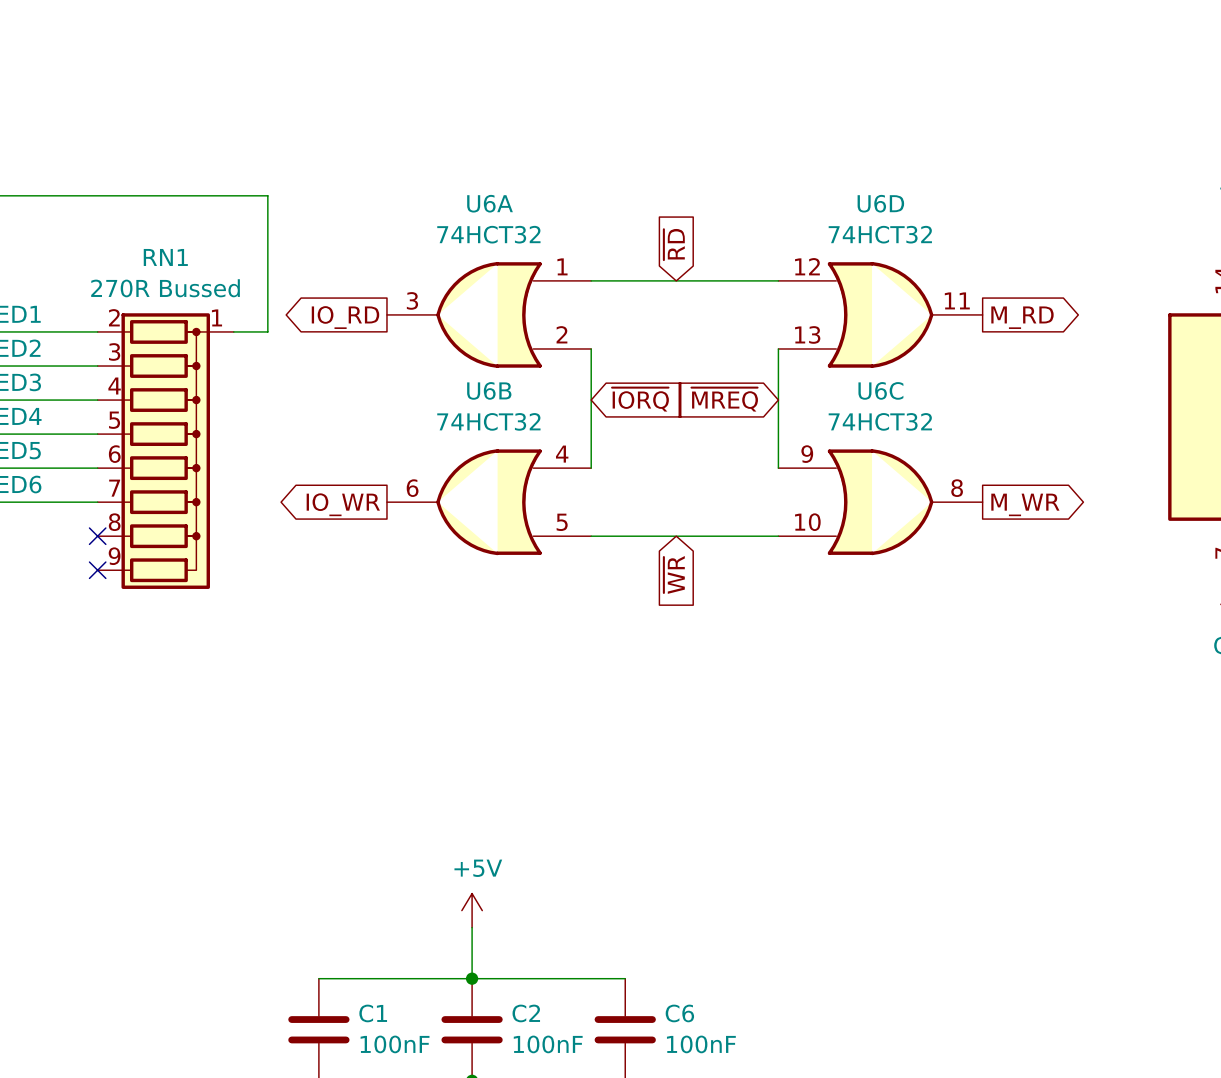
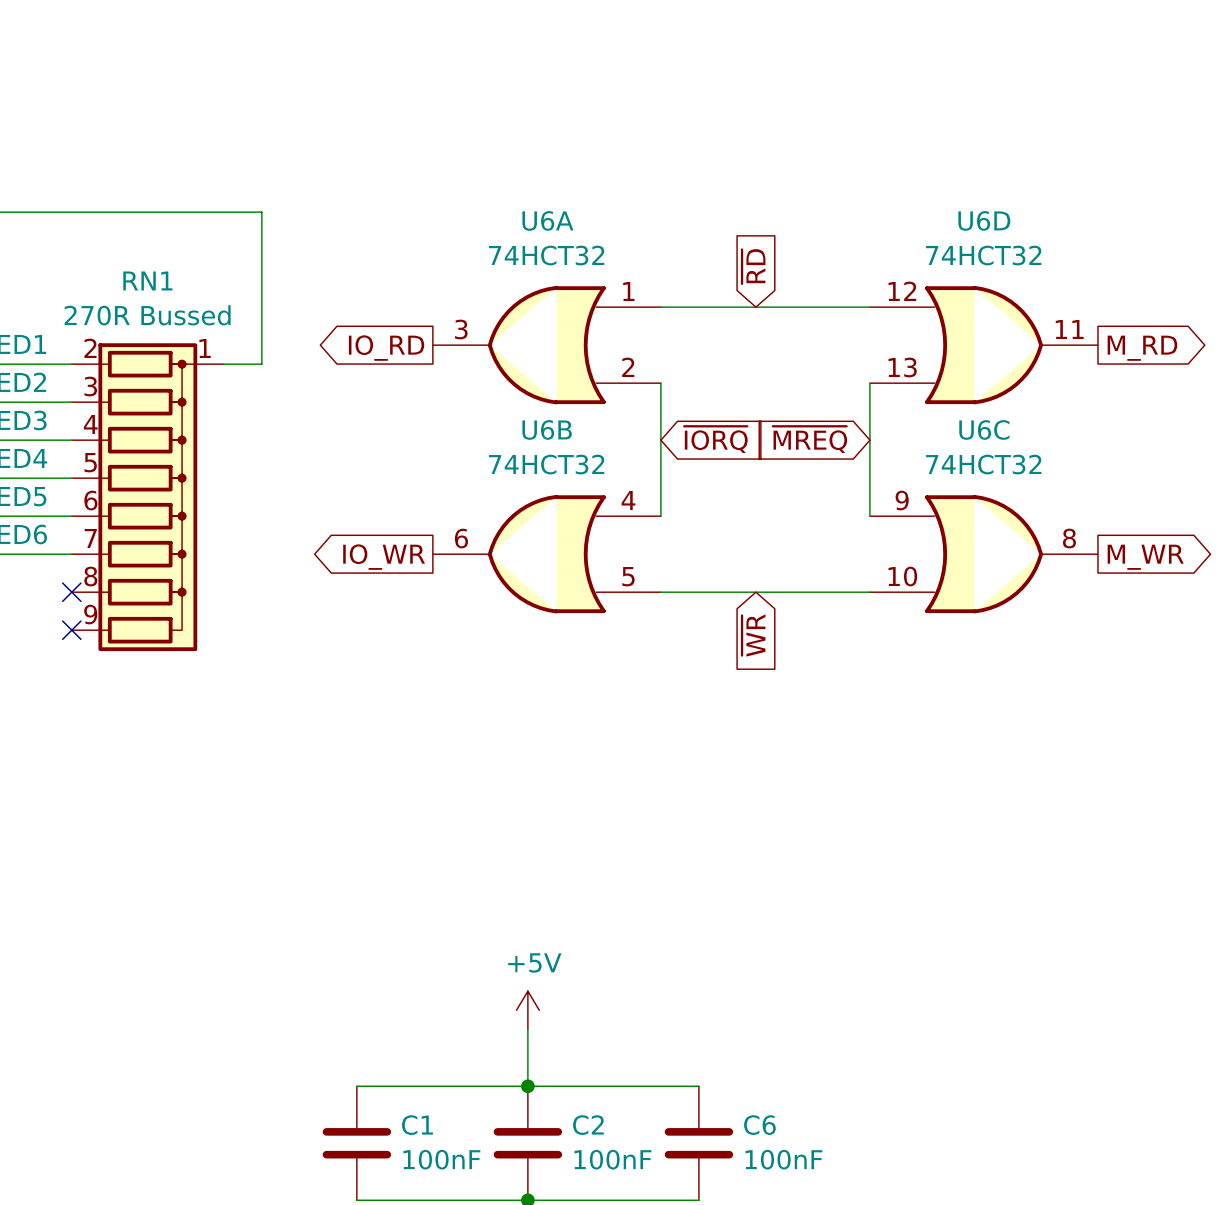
wire: (233, 195) (267, 195) (267, 331) (233, 331) -> (261, 212) (261, 364) (223, 364)
RN1 position: (165, 451) -> (147, 497)
no-connect mark: none -> (71, 592)
no-connect mark: (97, 536) -> none
no-connect mark: none -> (71, 630)
no-connect mark: (97, 570) -> none

